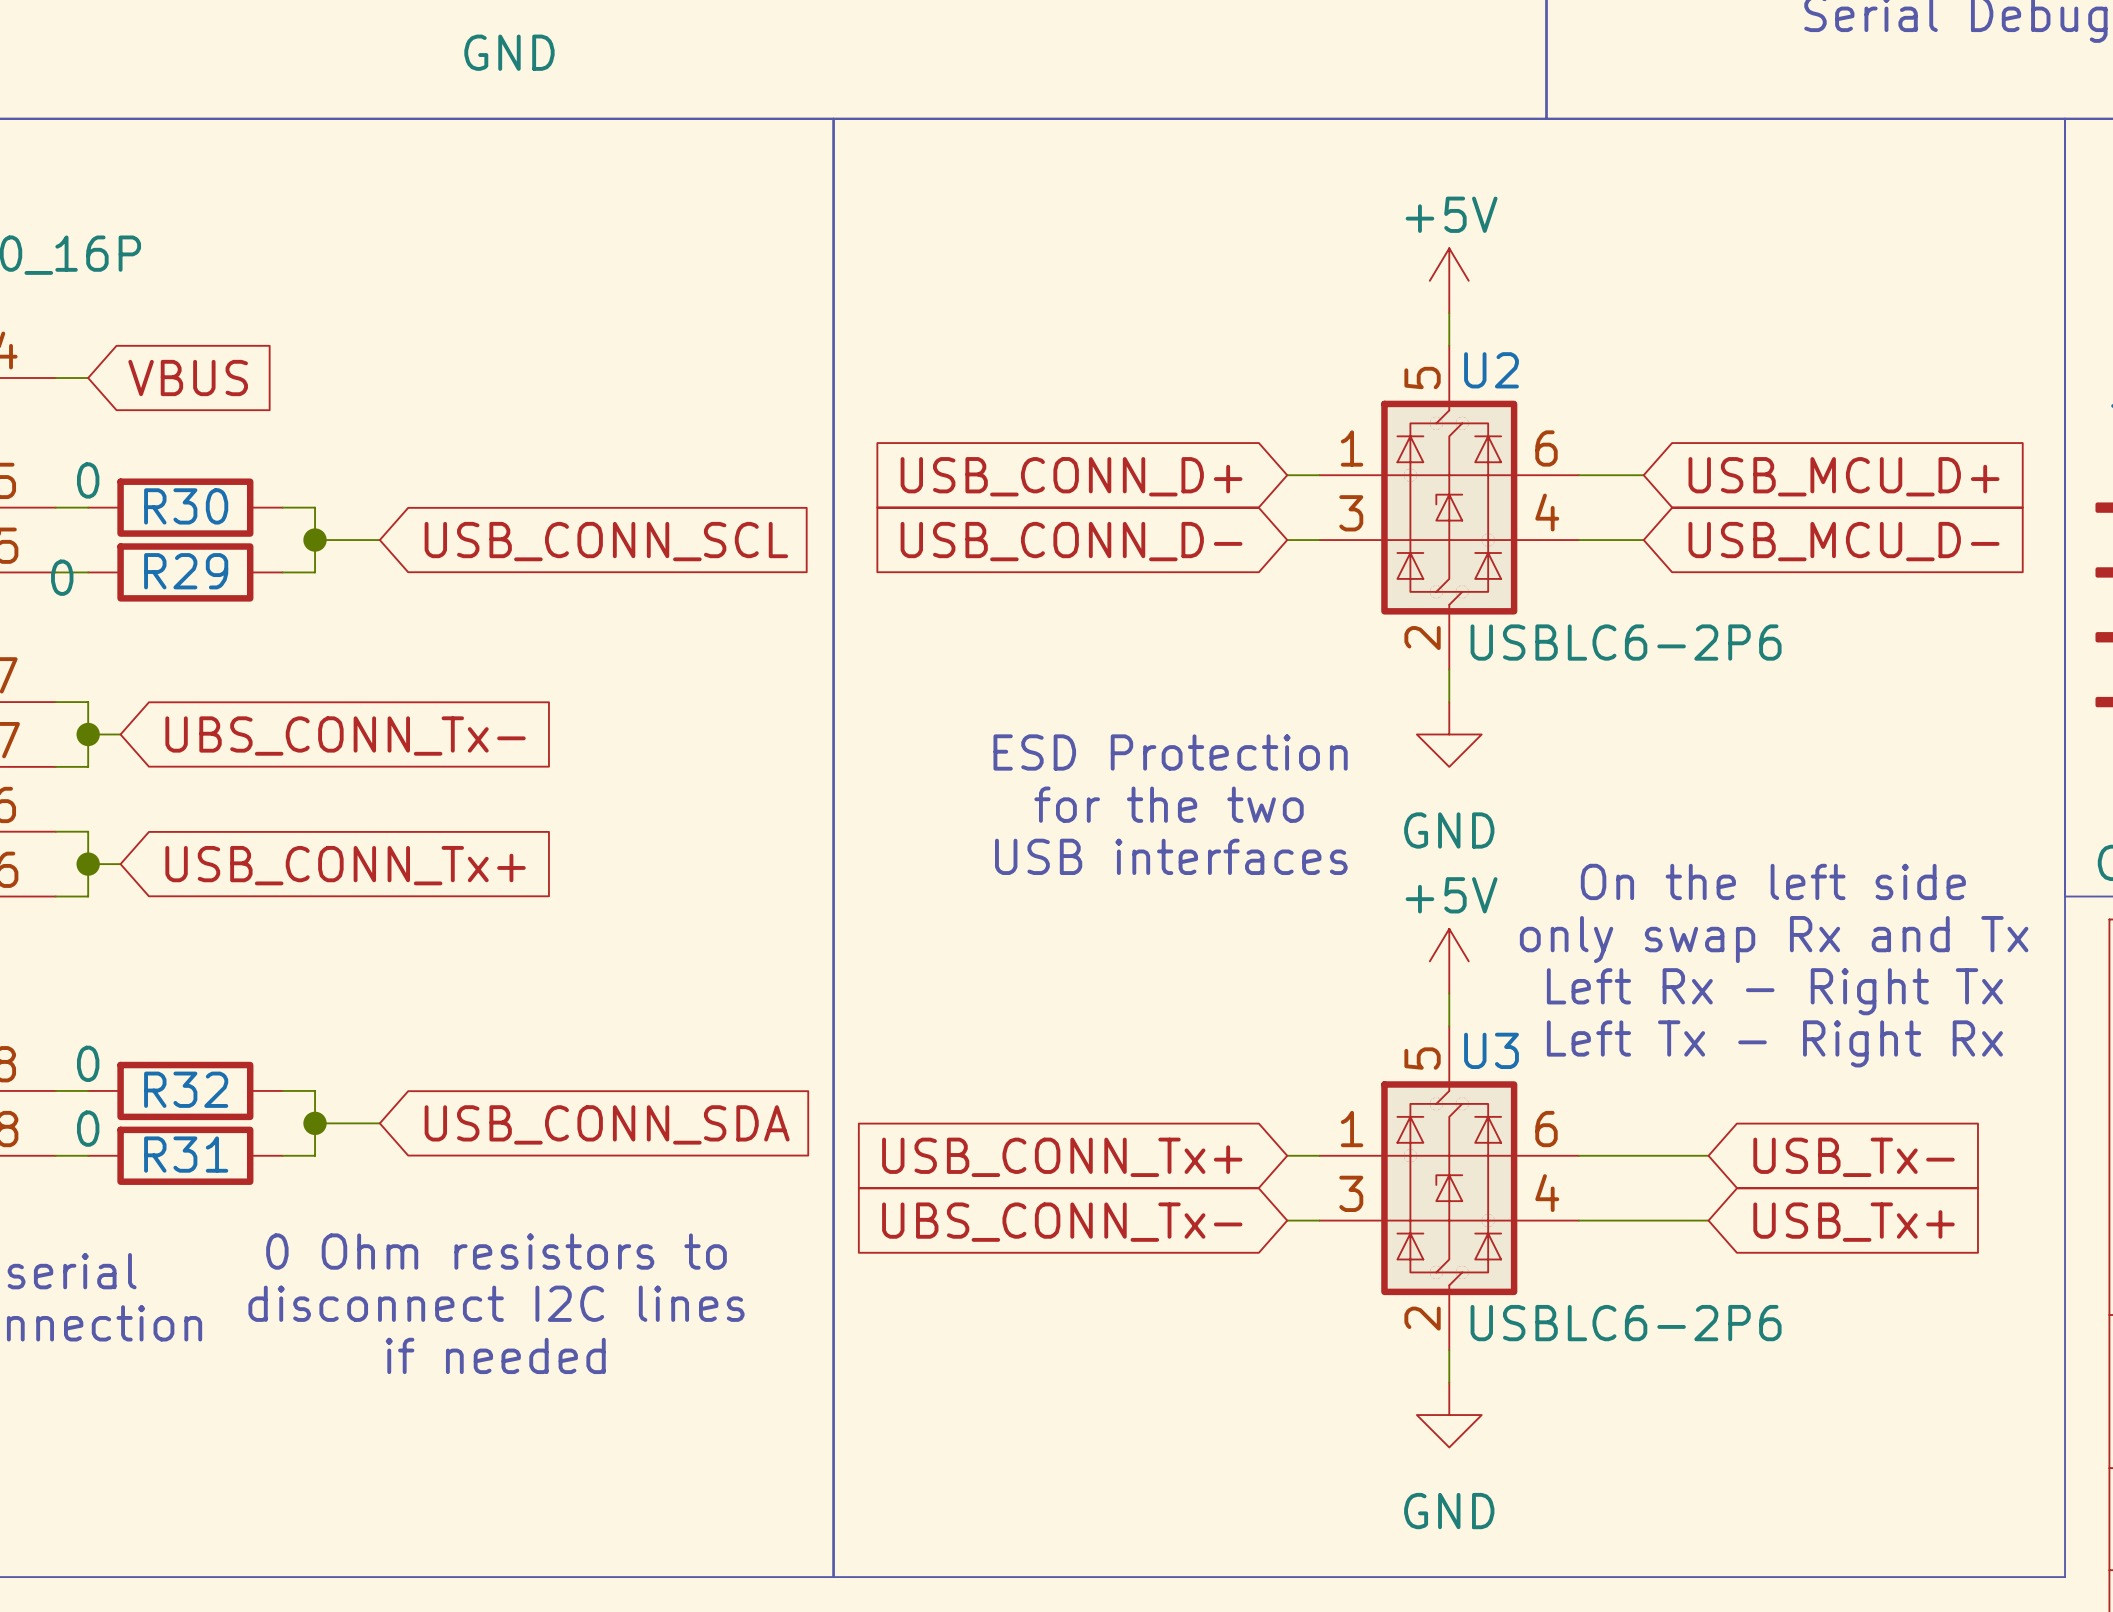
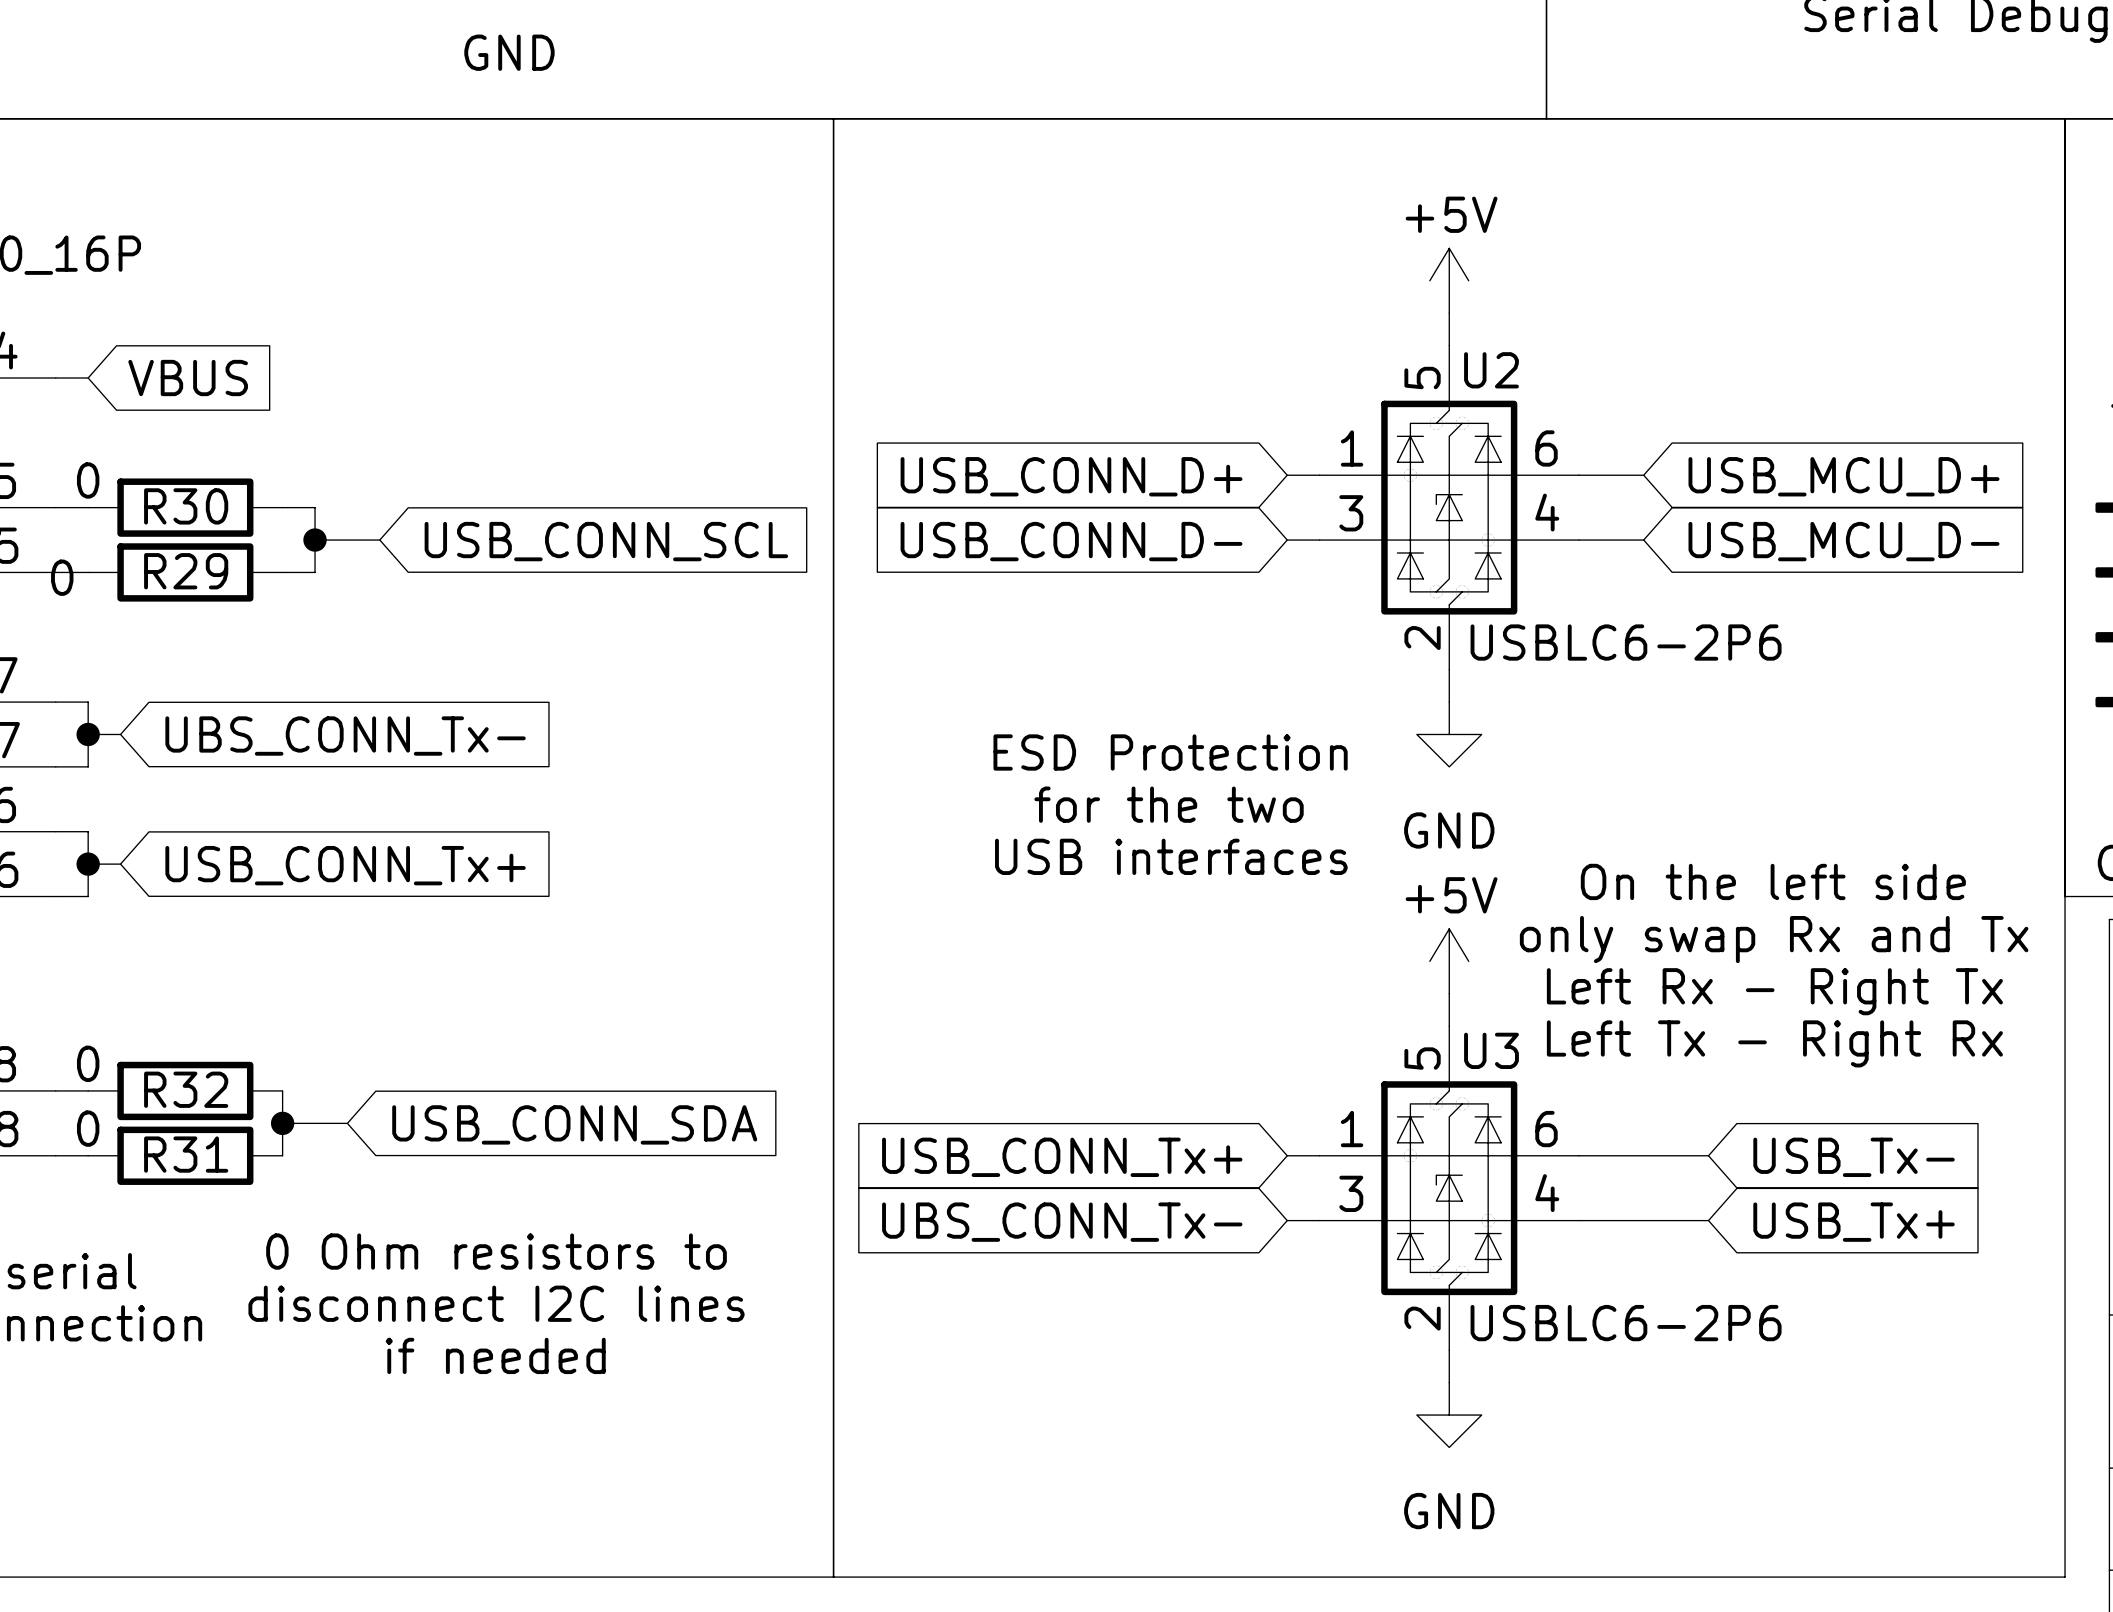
wire: (282, 1090) (315, 1090) (315, 1155) (282, 1155) -> (282, 1090) (282, 1155)
junction position: (315, 1123) -> (282, 1123)
wire: (347, 1123) (379, 1123) -> (282, 1123) (315, 1123)
global label position: USB_CONN_SDA (607, 1124) -> USB_CONN_SDA (574, 1124)

